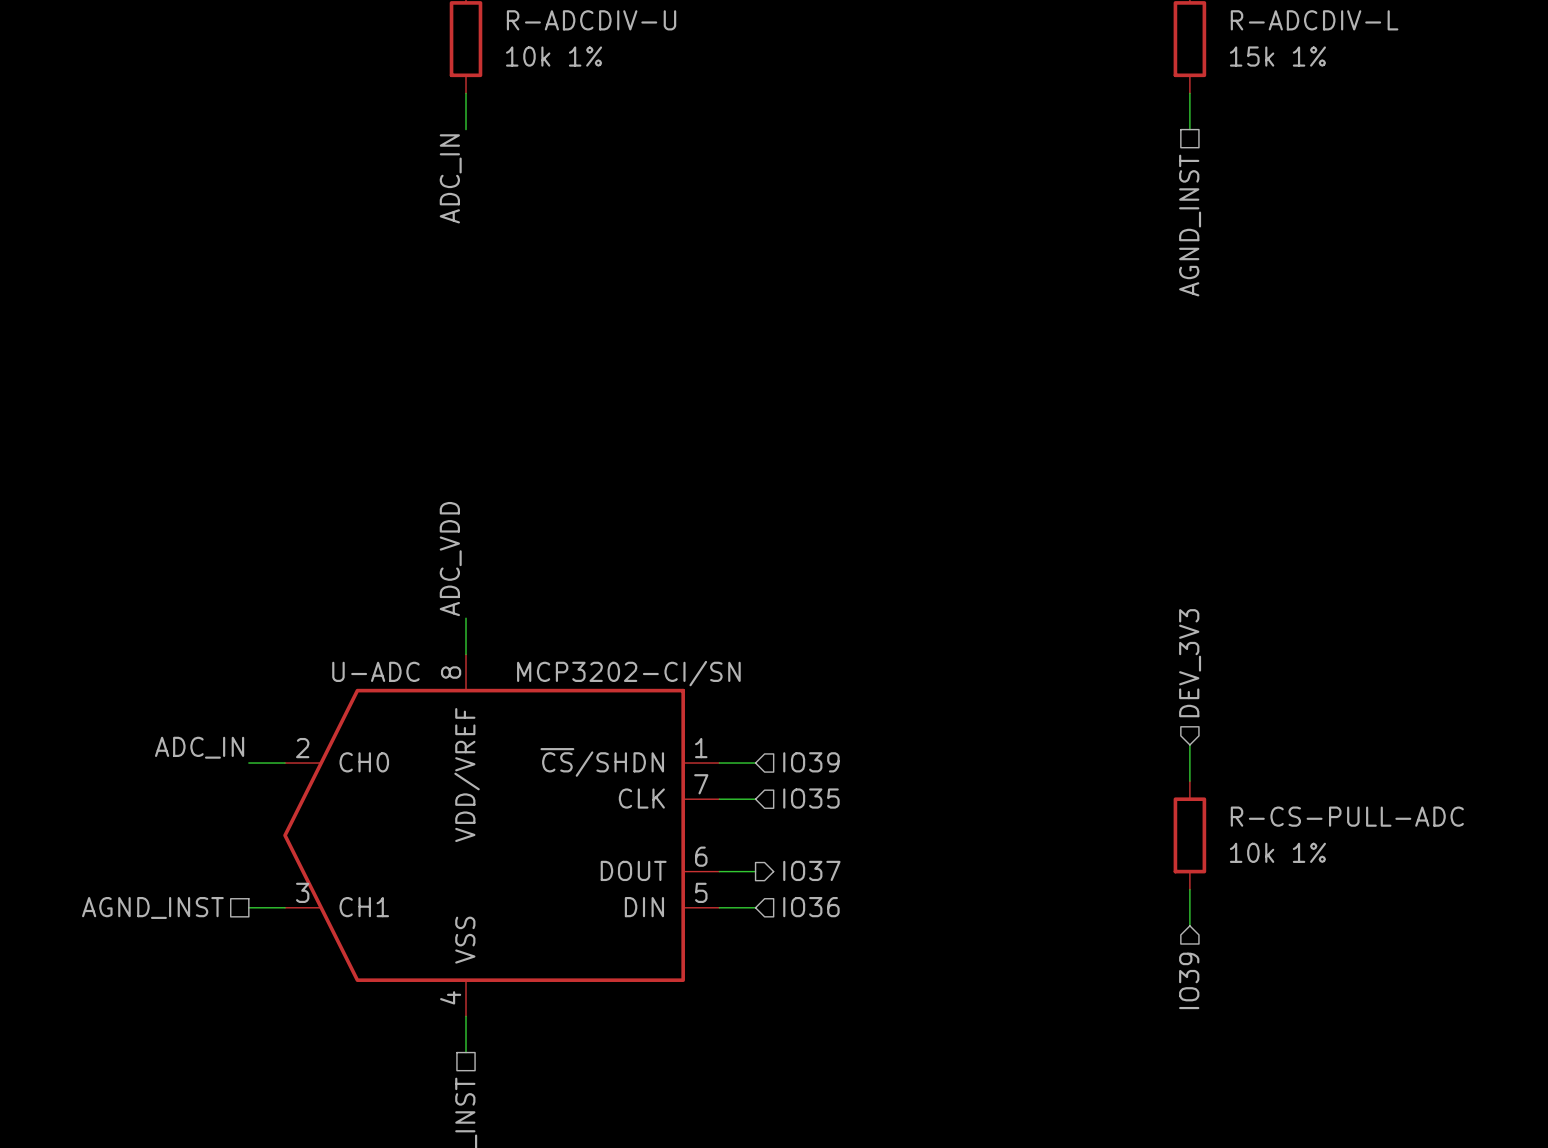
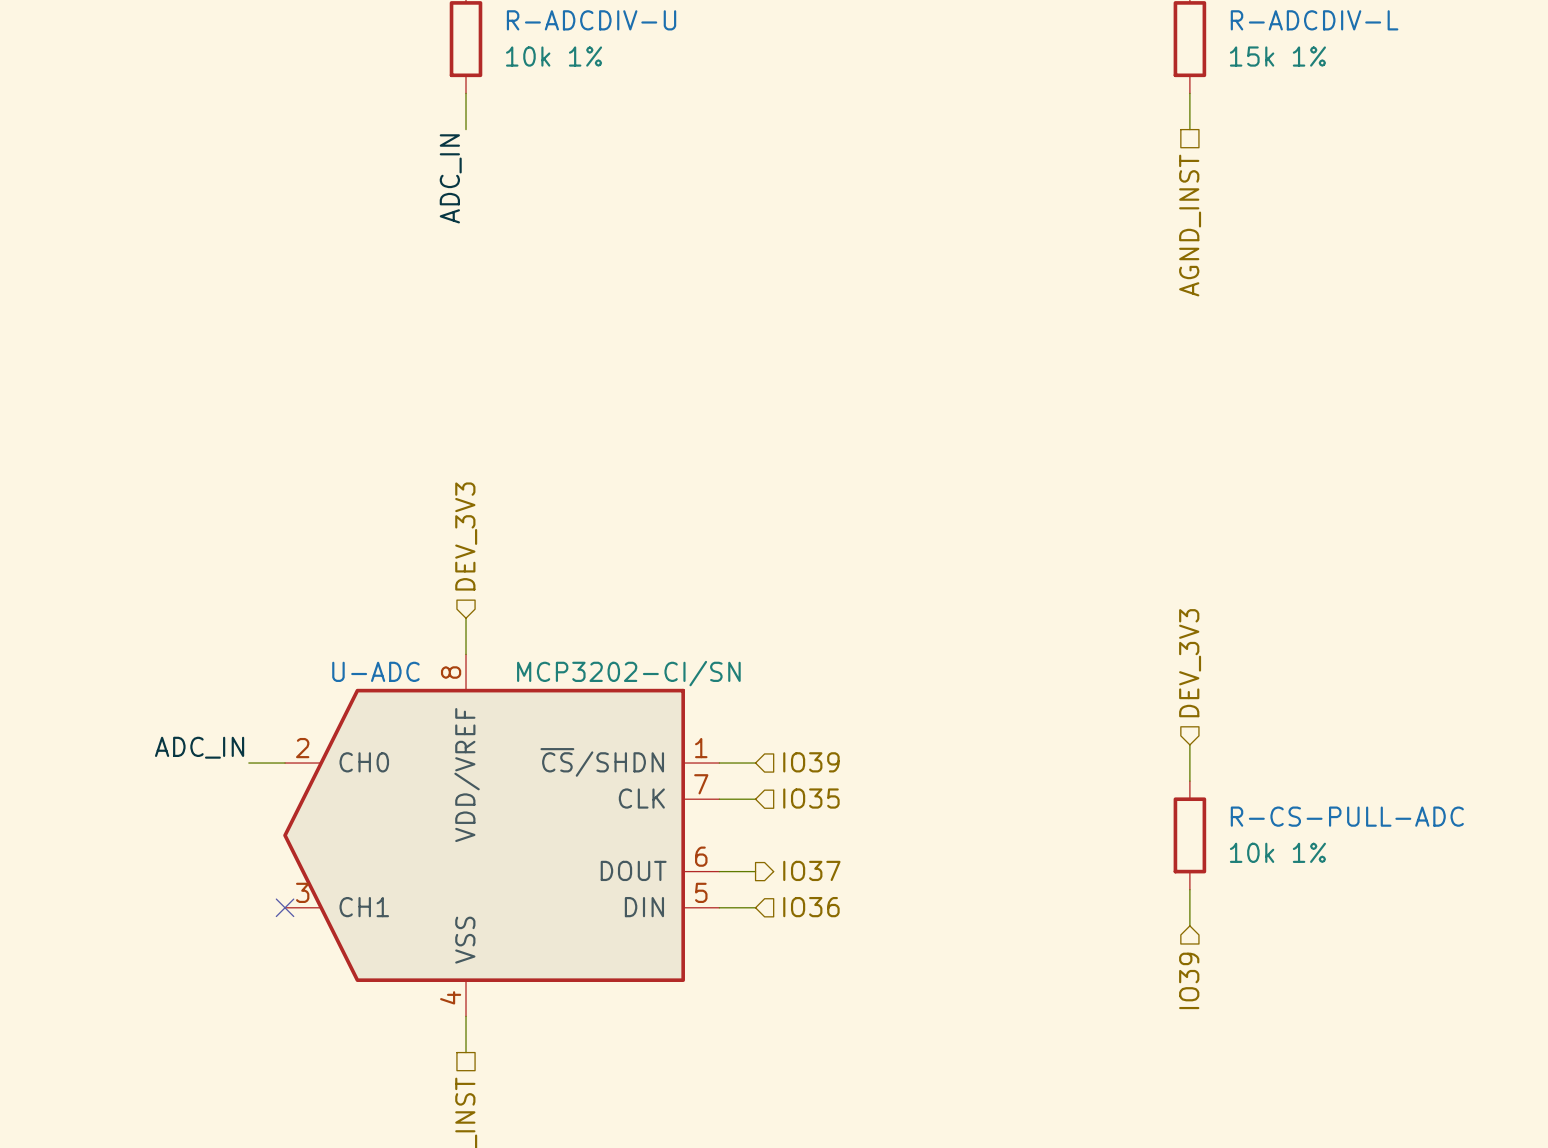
hierarchical label: none -> DEV_3V3 (466, 536)
label: ADC_VDD (450, 559) -> none
hierarchical label: AGND_INST (152, 907) -> none
wire: (248, 907) (285, 907) -> none
no-connect mark: none -> (285, 907)

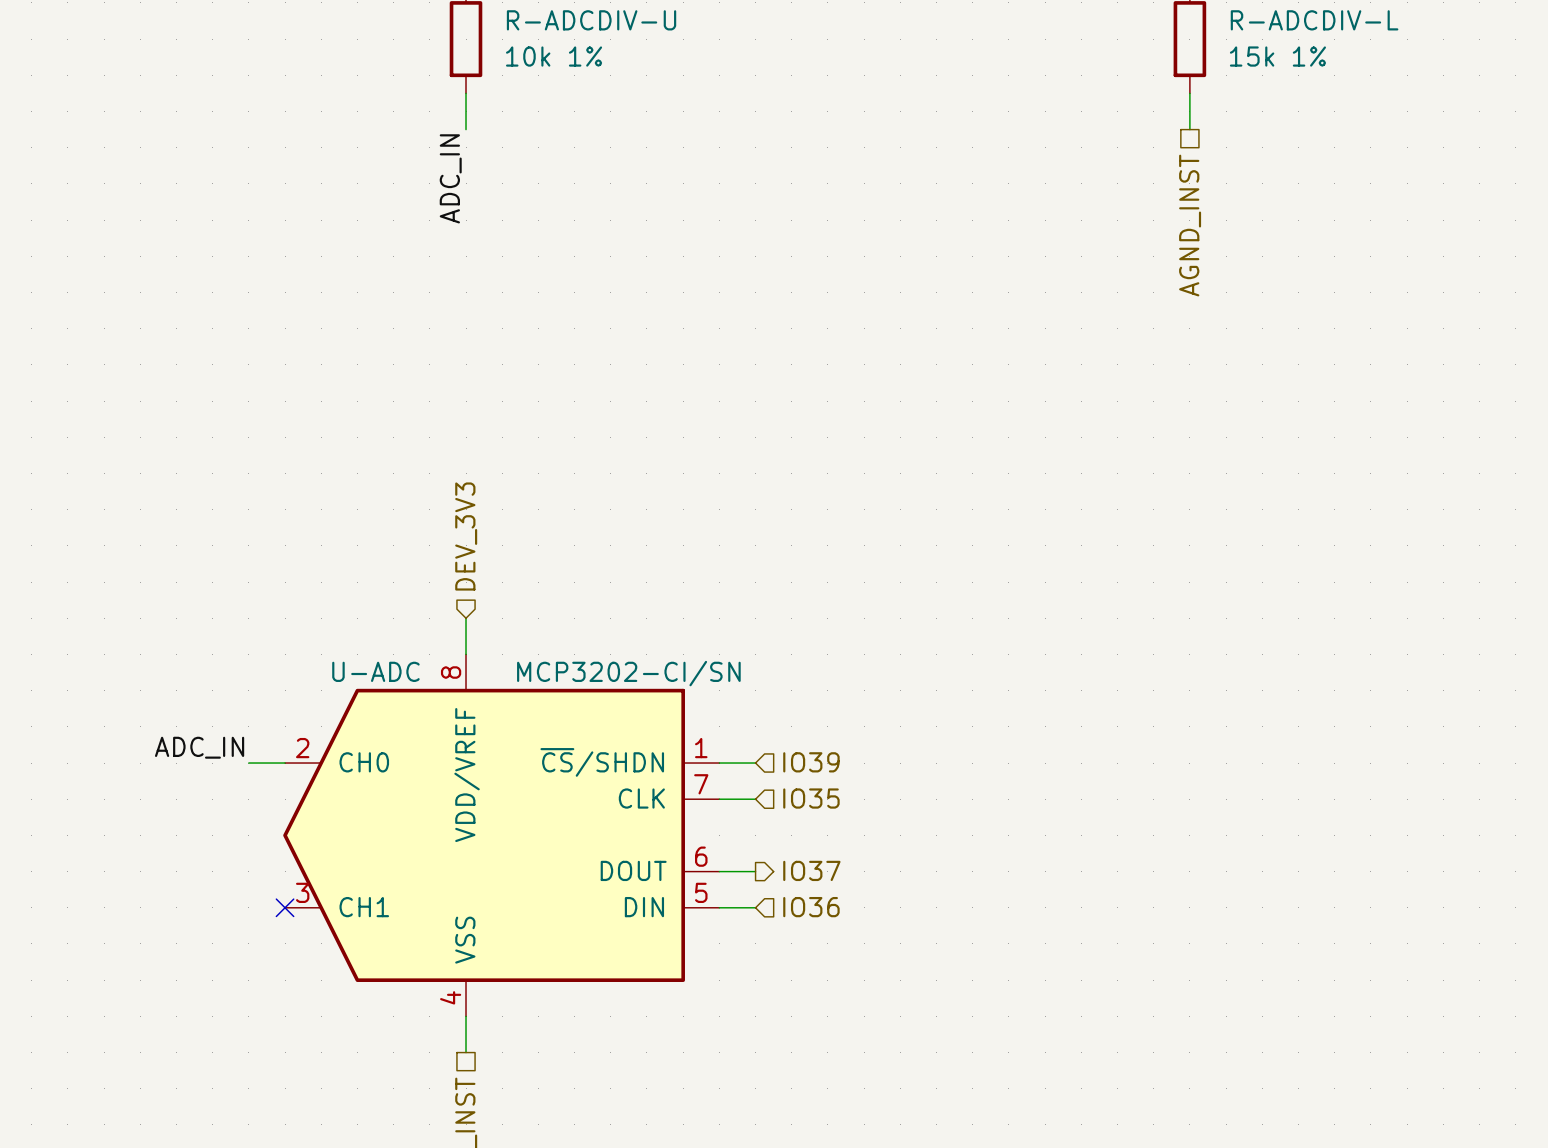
hierarchical label: DEV_3V3 (1190, 663) -> none
wire: (1189, 744) (1189, 781) -> none
R-CS-PULL-ADC: 10k 1% (1189, 835) -> none
wire: (1189, 889) (1189, 925) -> none
hierarchical label: IO39 (1189, 980) -> none

